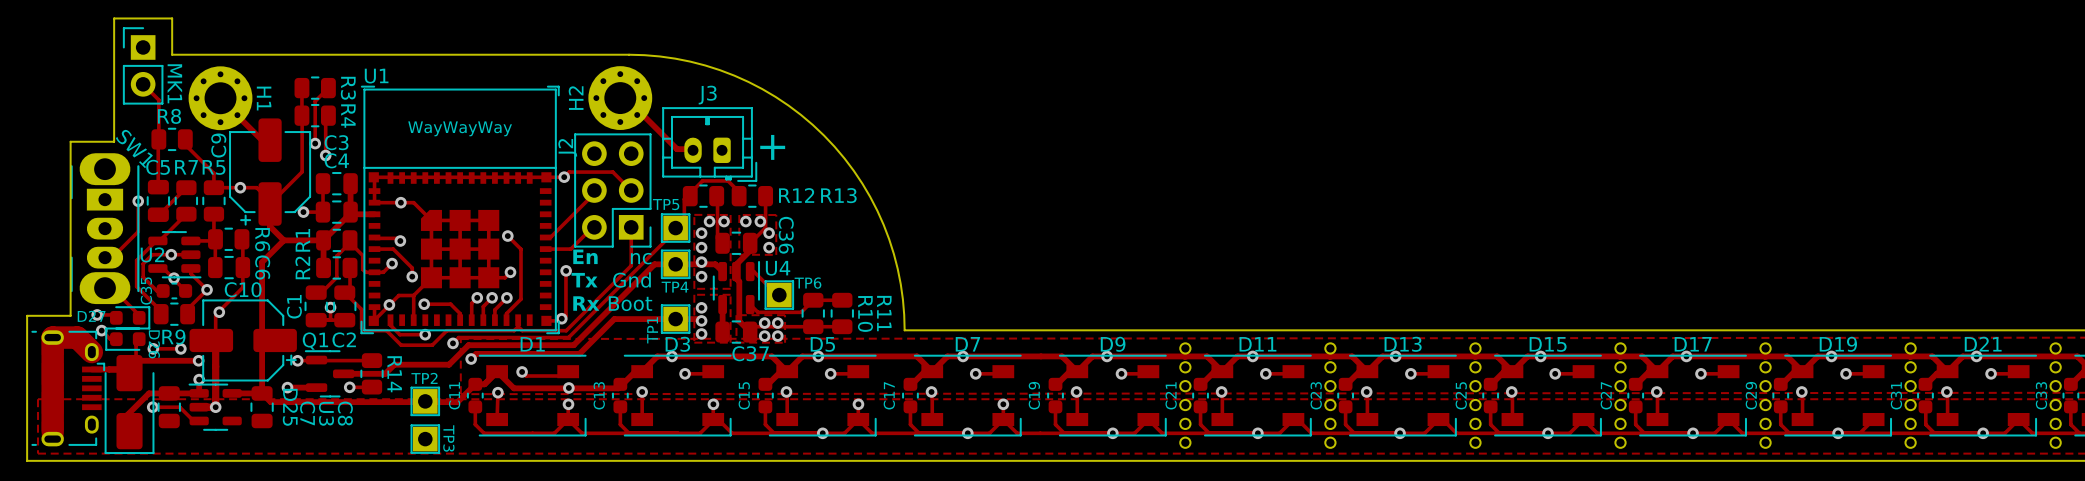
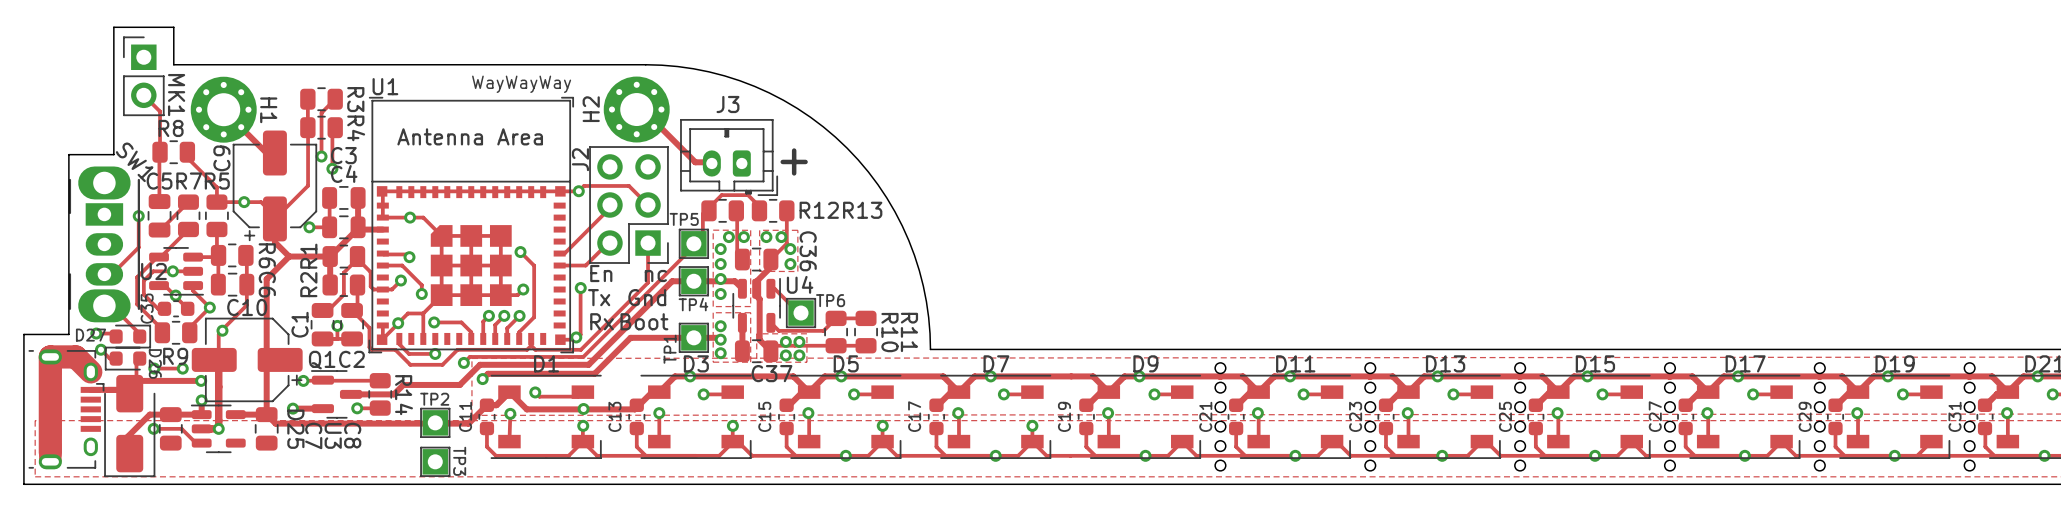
U1 text: none -> Antenna Area (470, 136)
text position: WayWayWay (460, 128) -> WayWayWay (521, 84)

